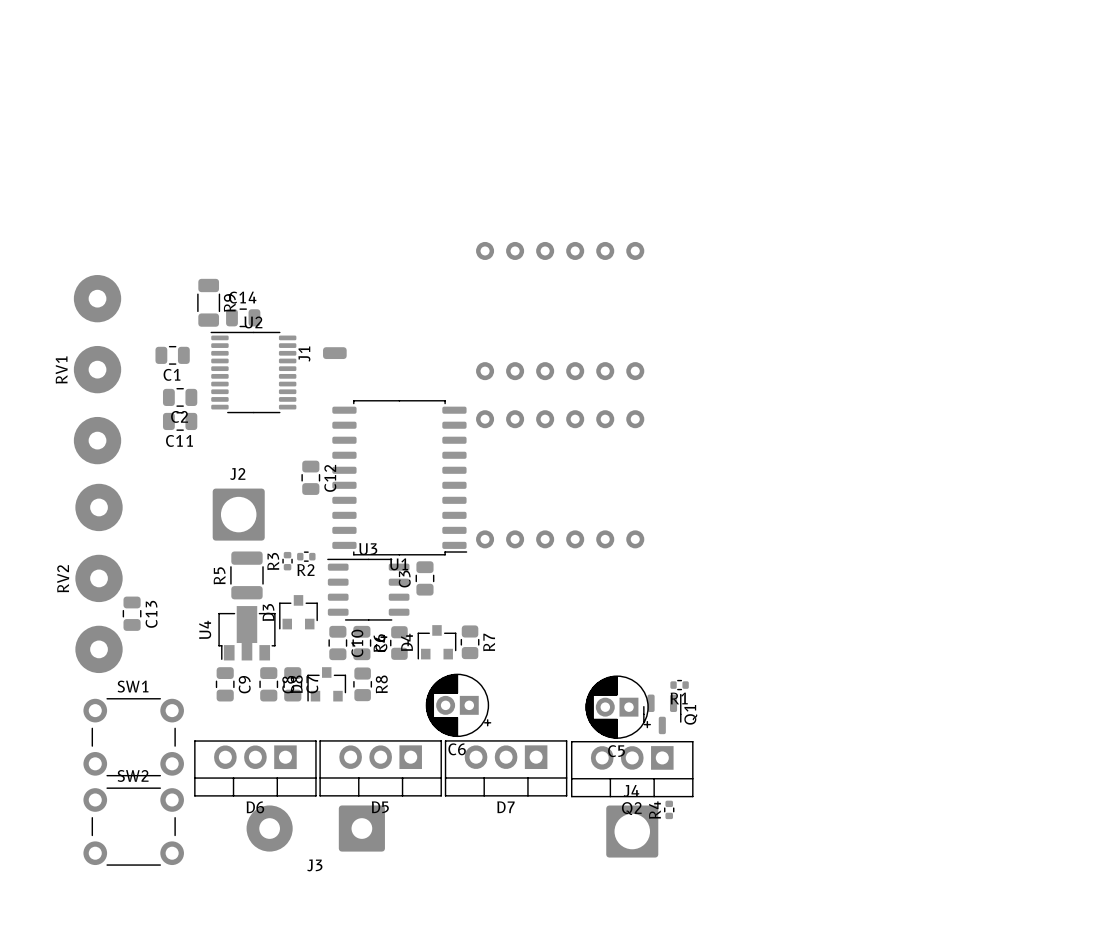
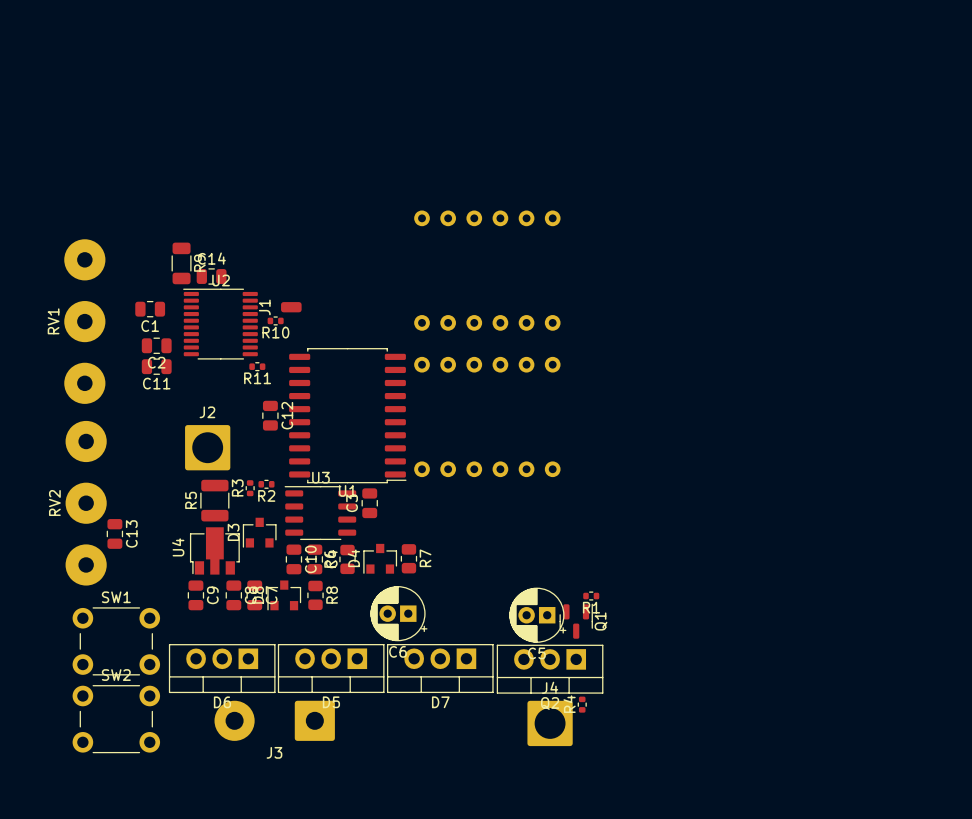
R10: none -> (275, 320)
R11: none -> (257, 366)

